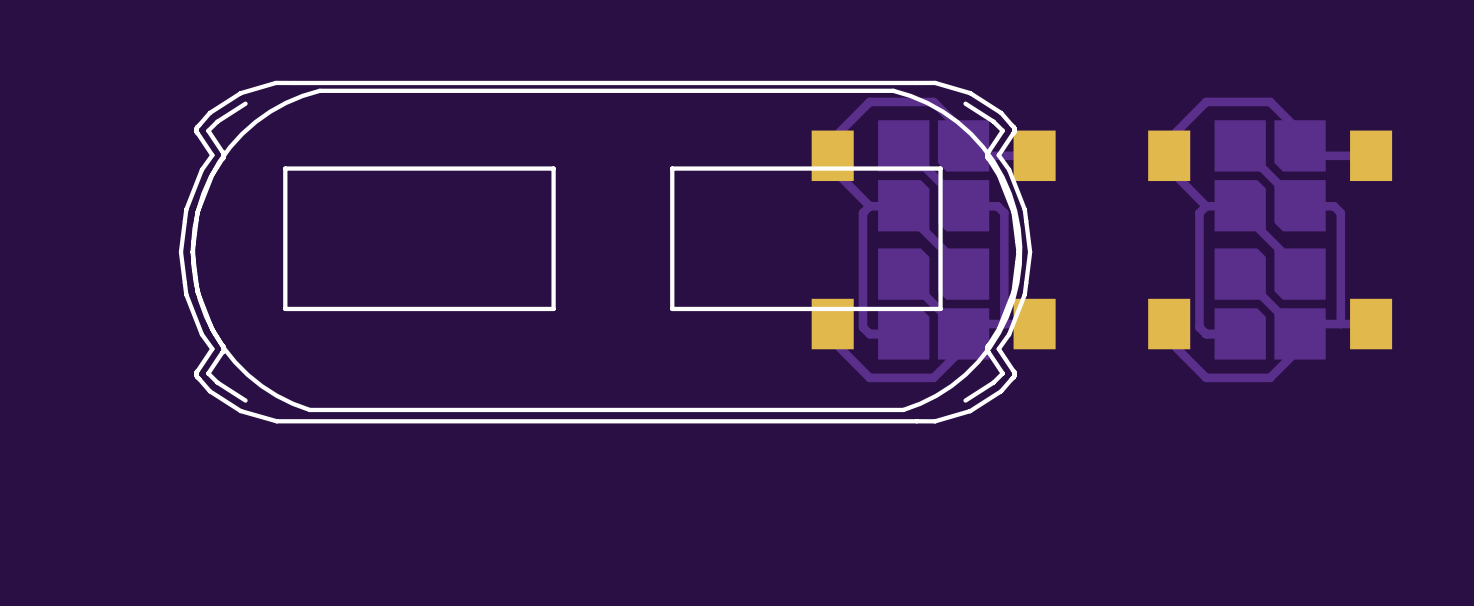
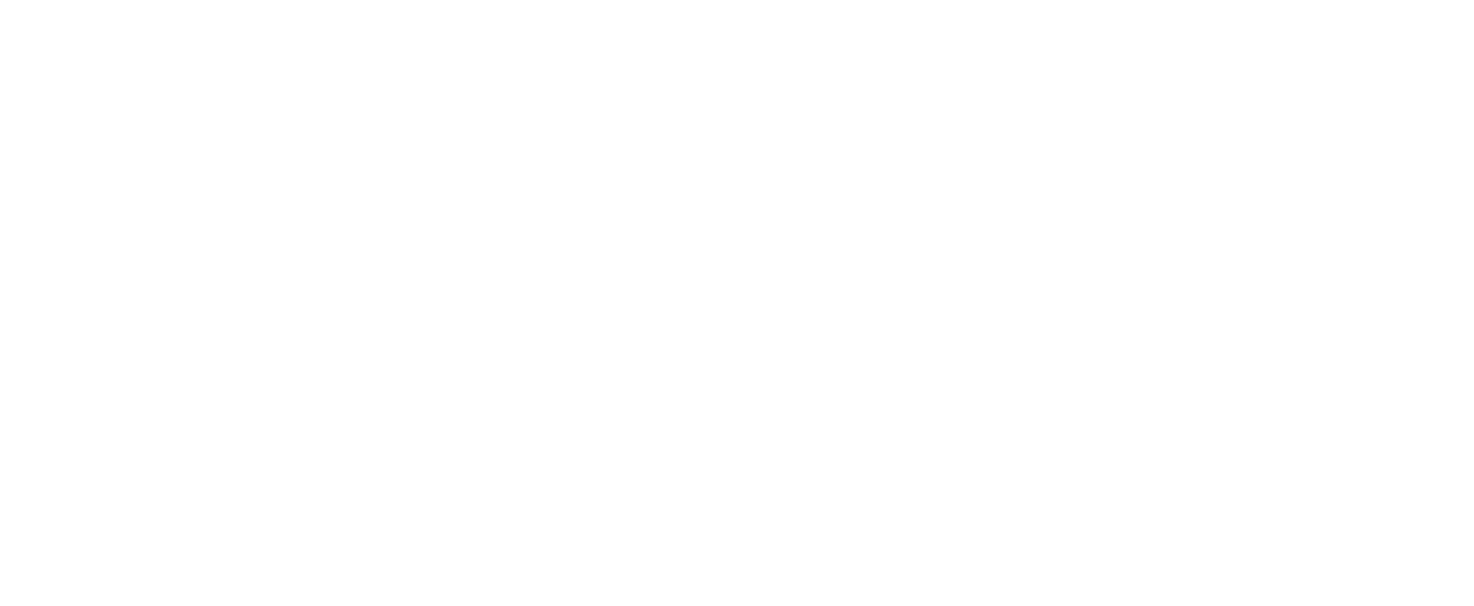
drawing: [178, 80, 1033, 424] -> none
part: (933, 239) -> none
part: (1270, 239) -> none

